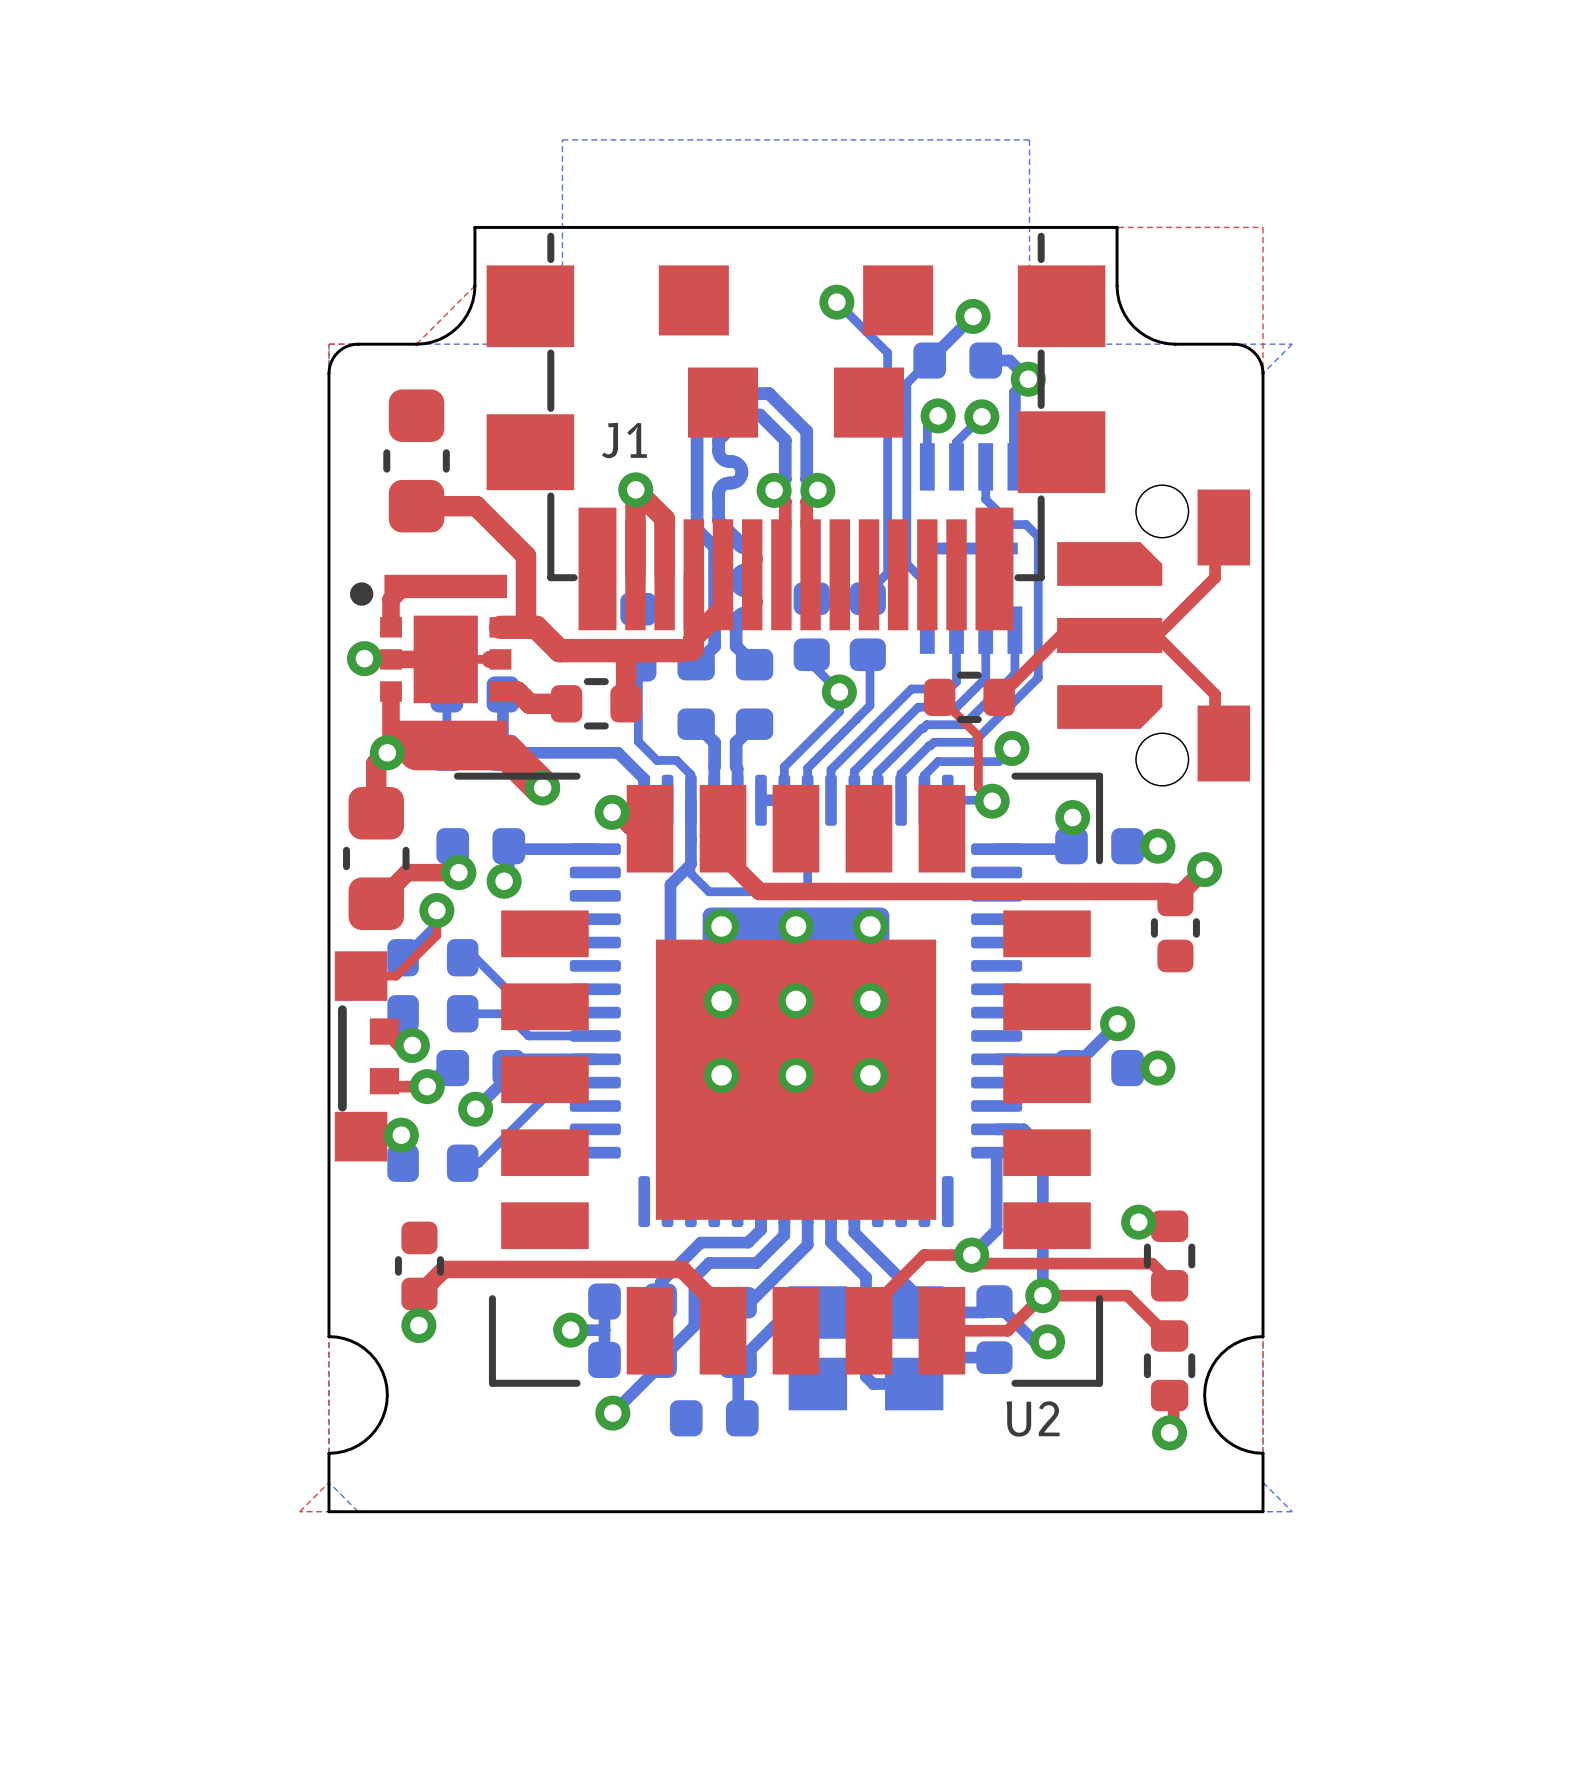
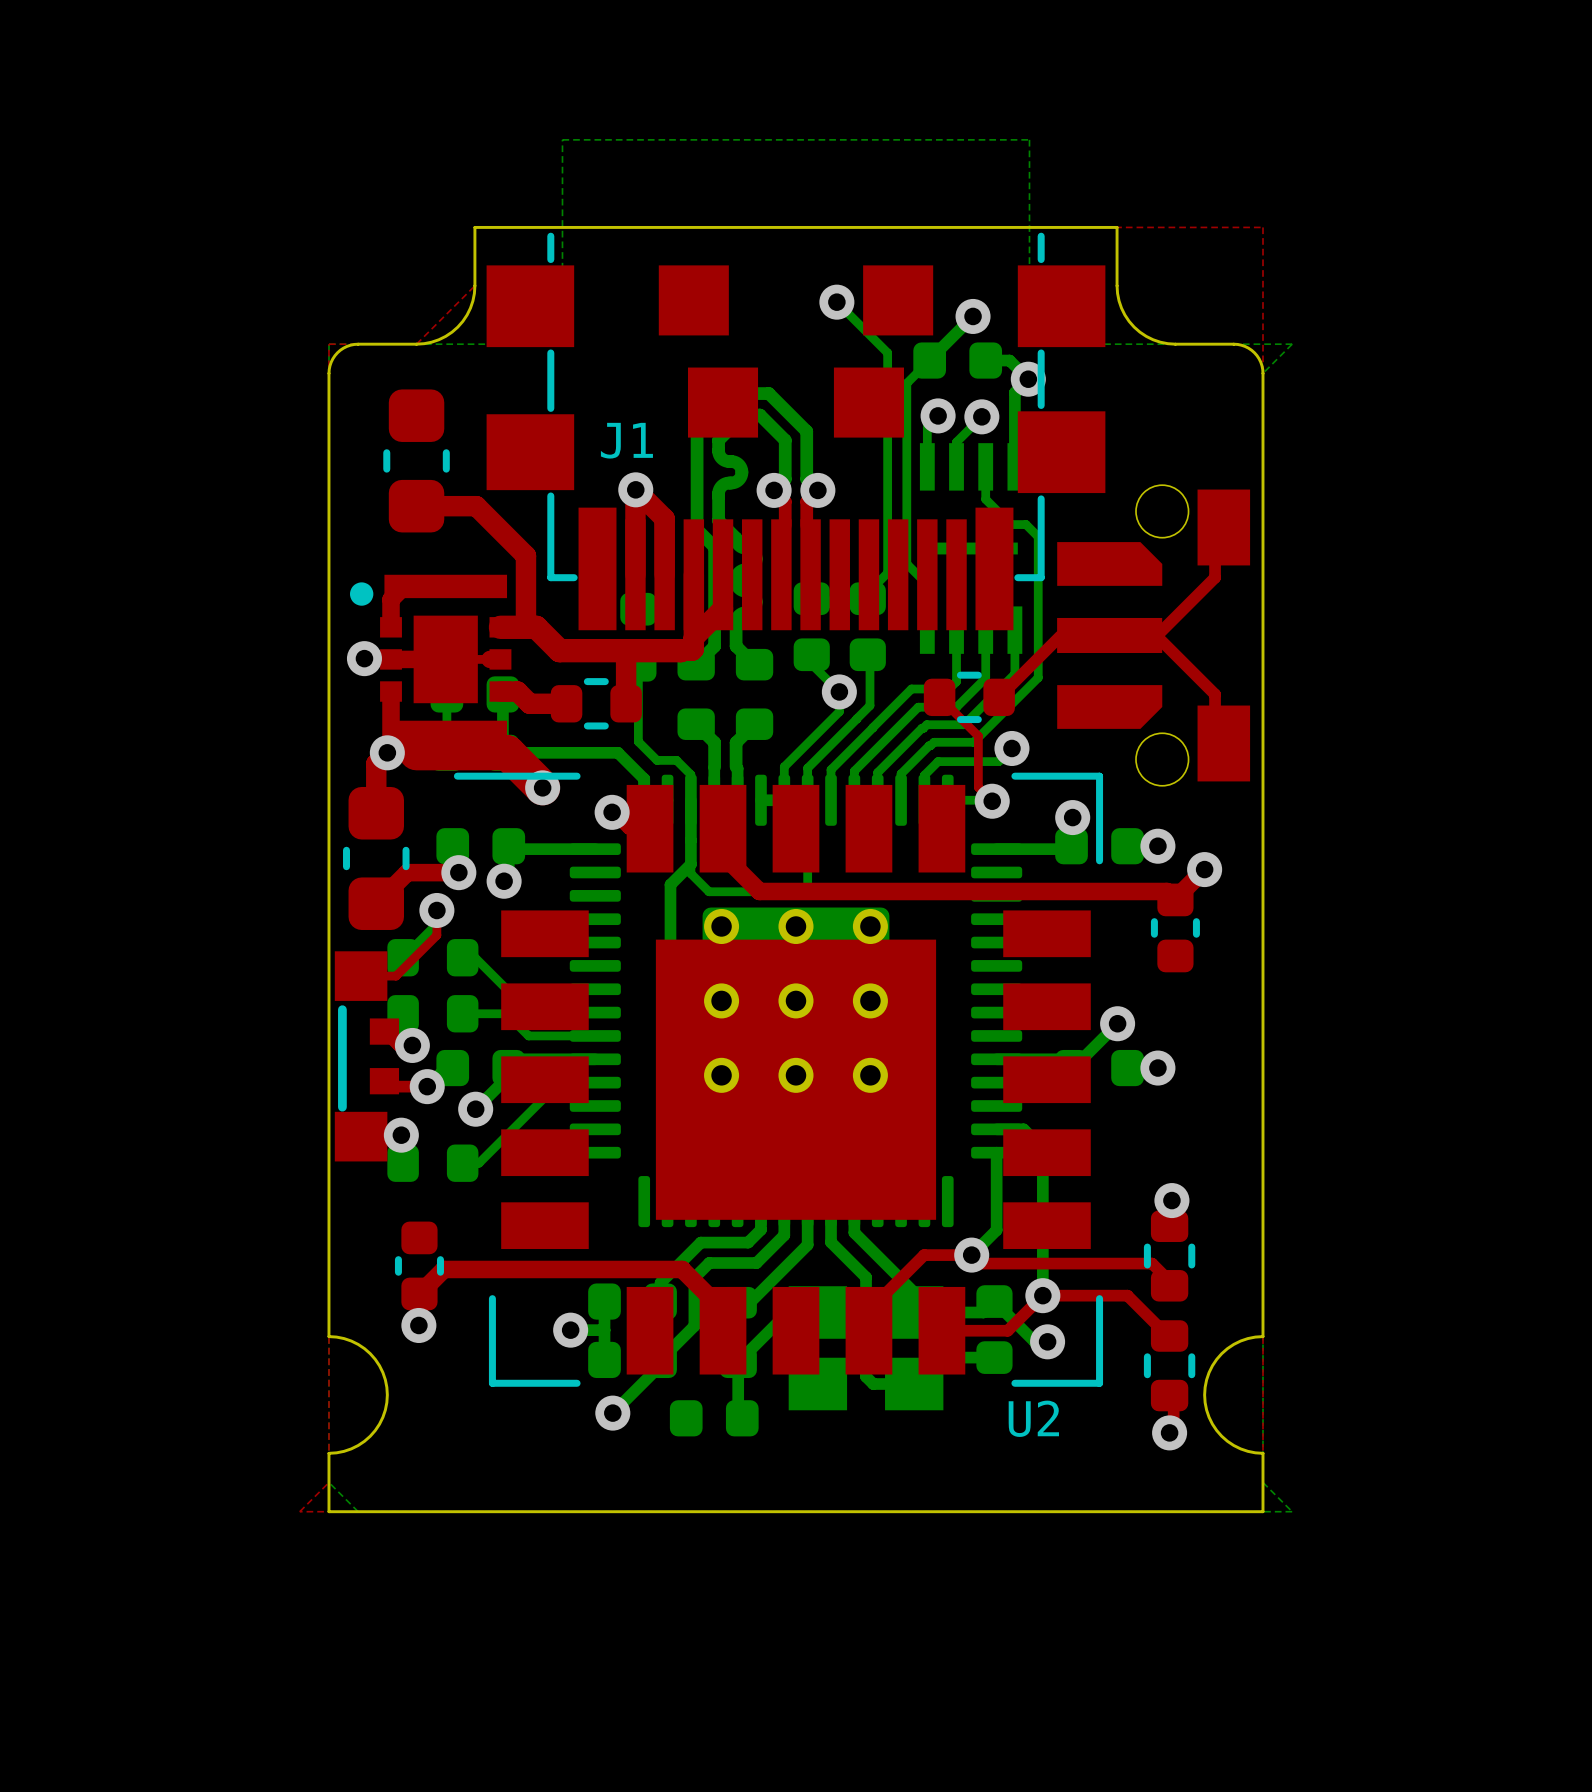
via position: (1138, 1222) -> (1171, 1200)

